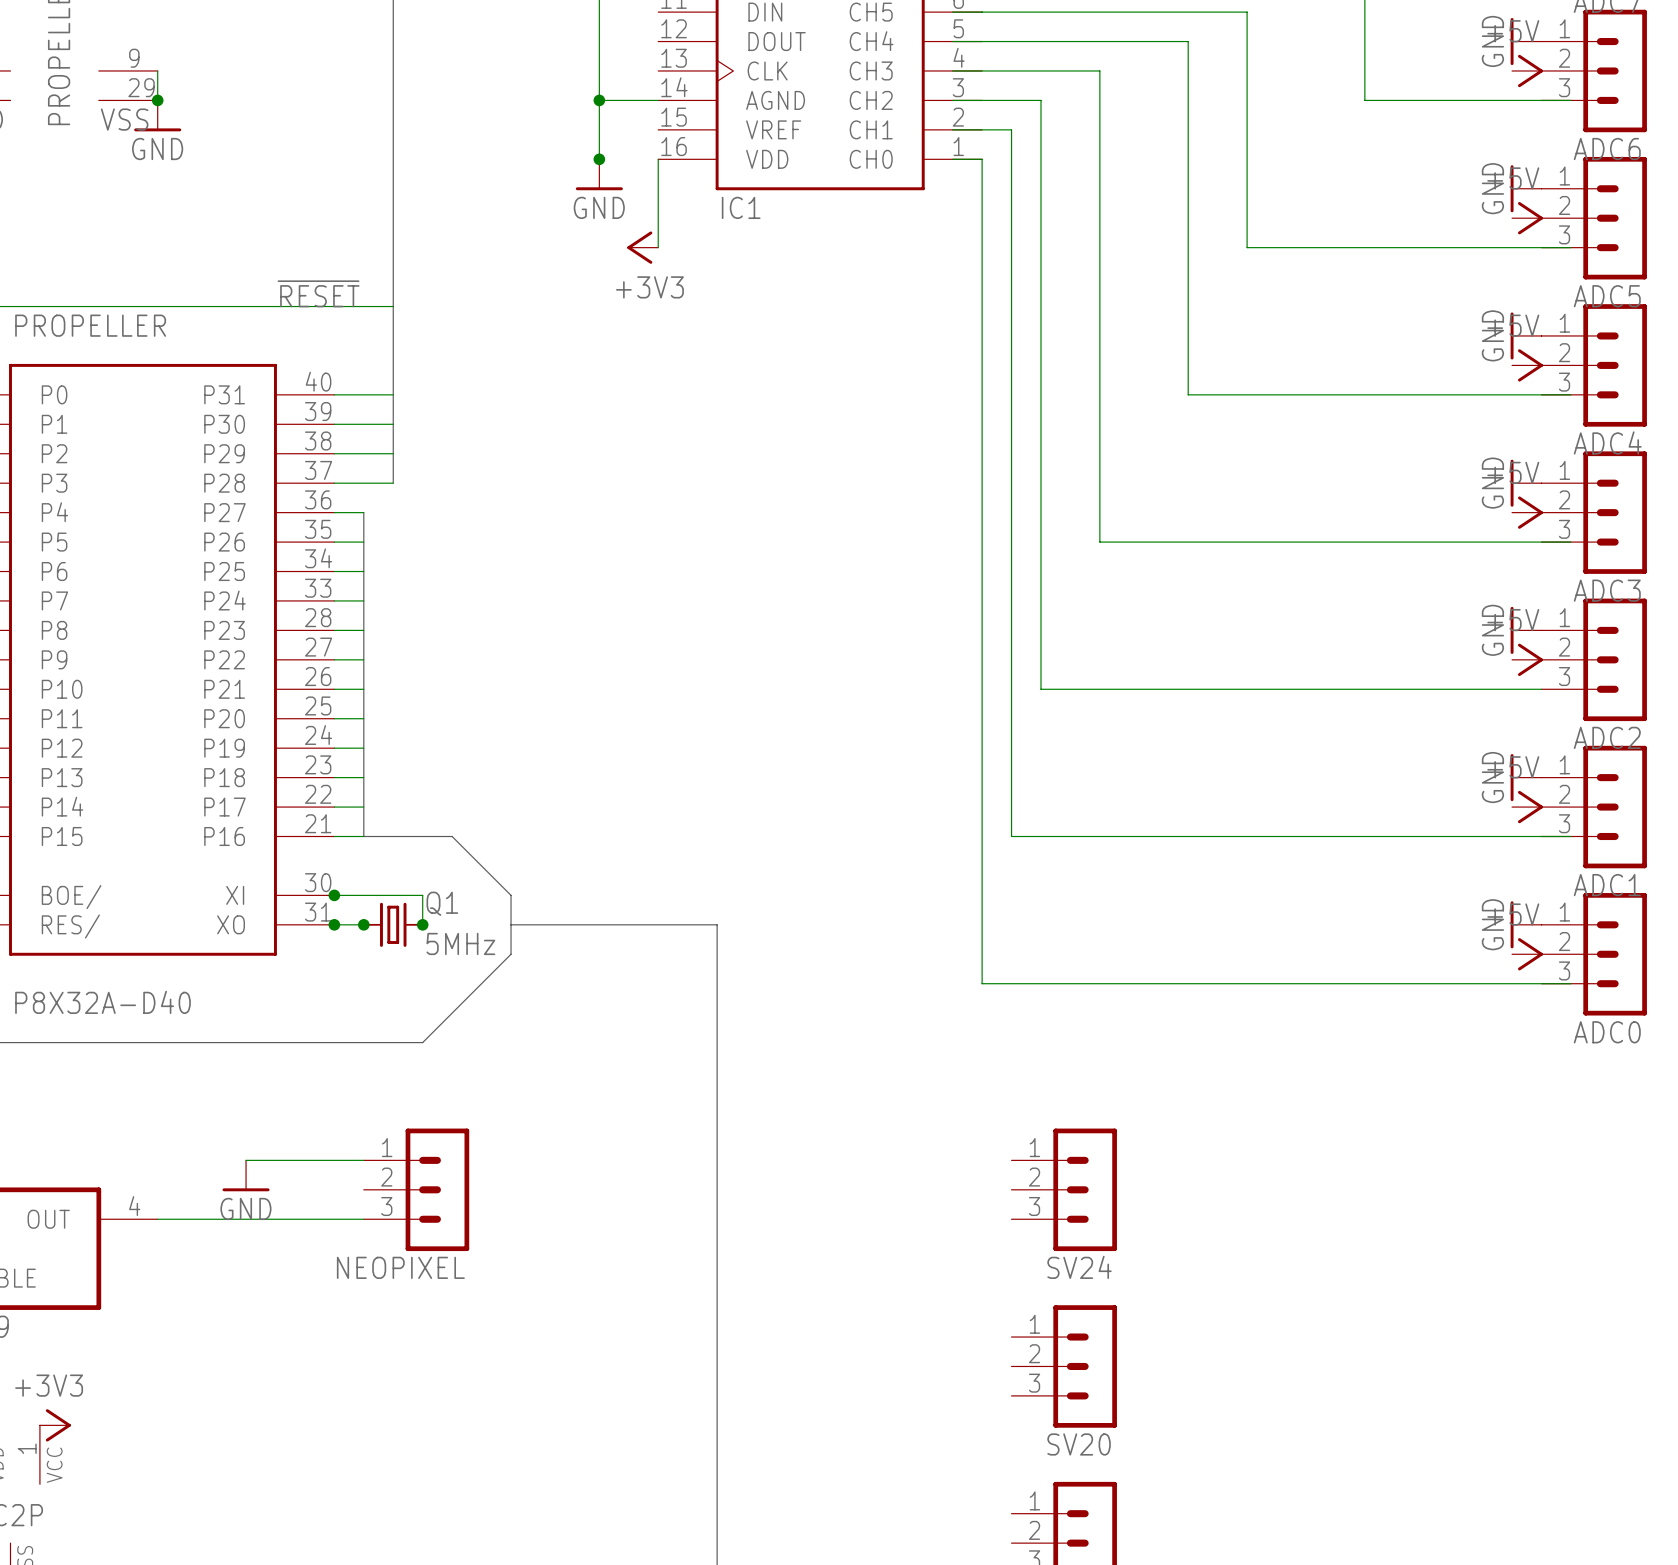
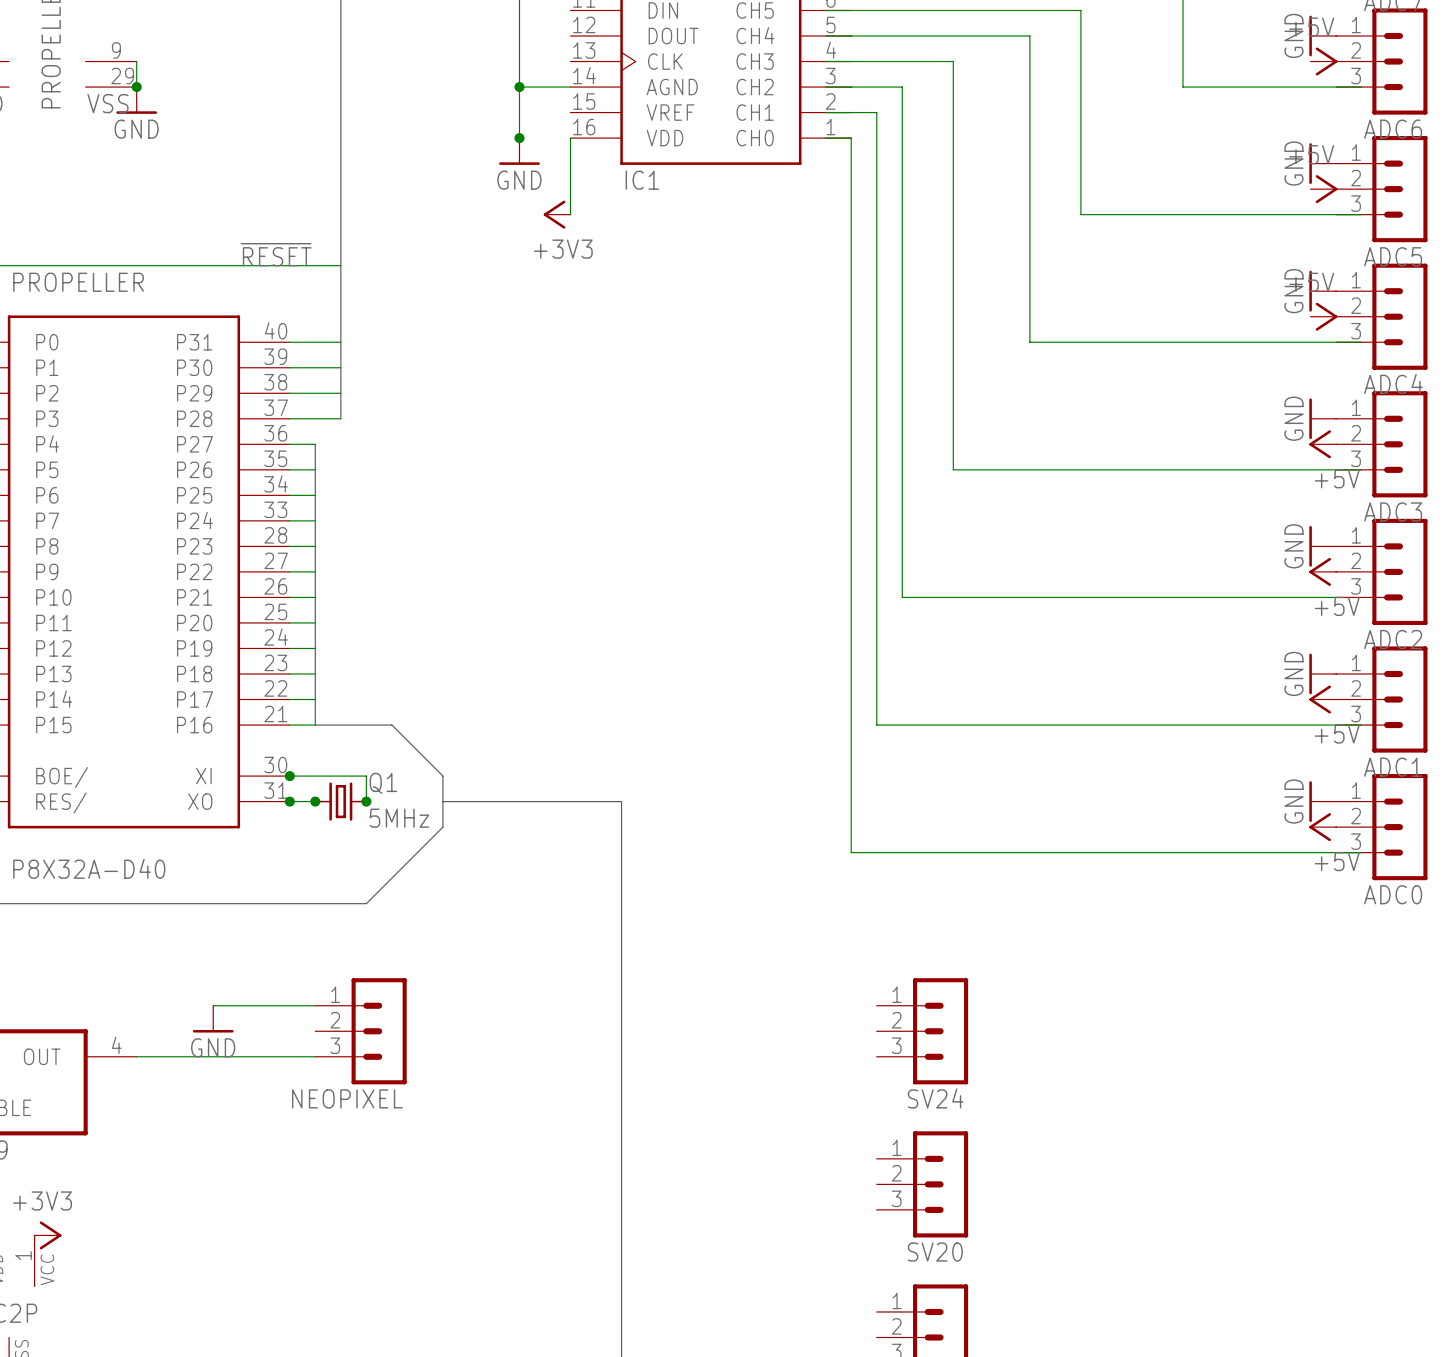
power symbol rotation: 0° (1530, 512) -> 180° (1320, 444)
power symbol rotation: 0° (1530, 659) -> 180° (1320, 571)
power symbol rotation: 0° (1530, 807) -> 180° (1320, 699)
power symbol rotation: 0° (1530, 954) -> 180° (1320, 827)

